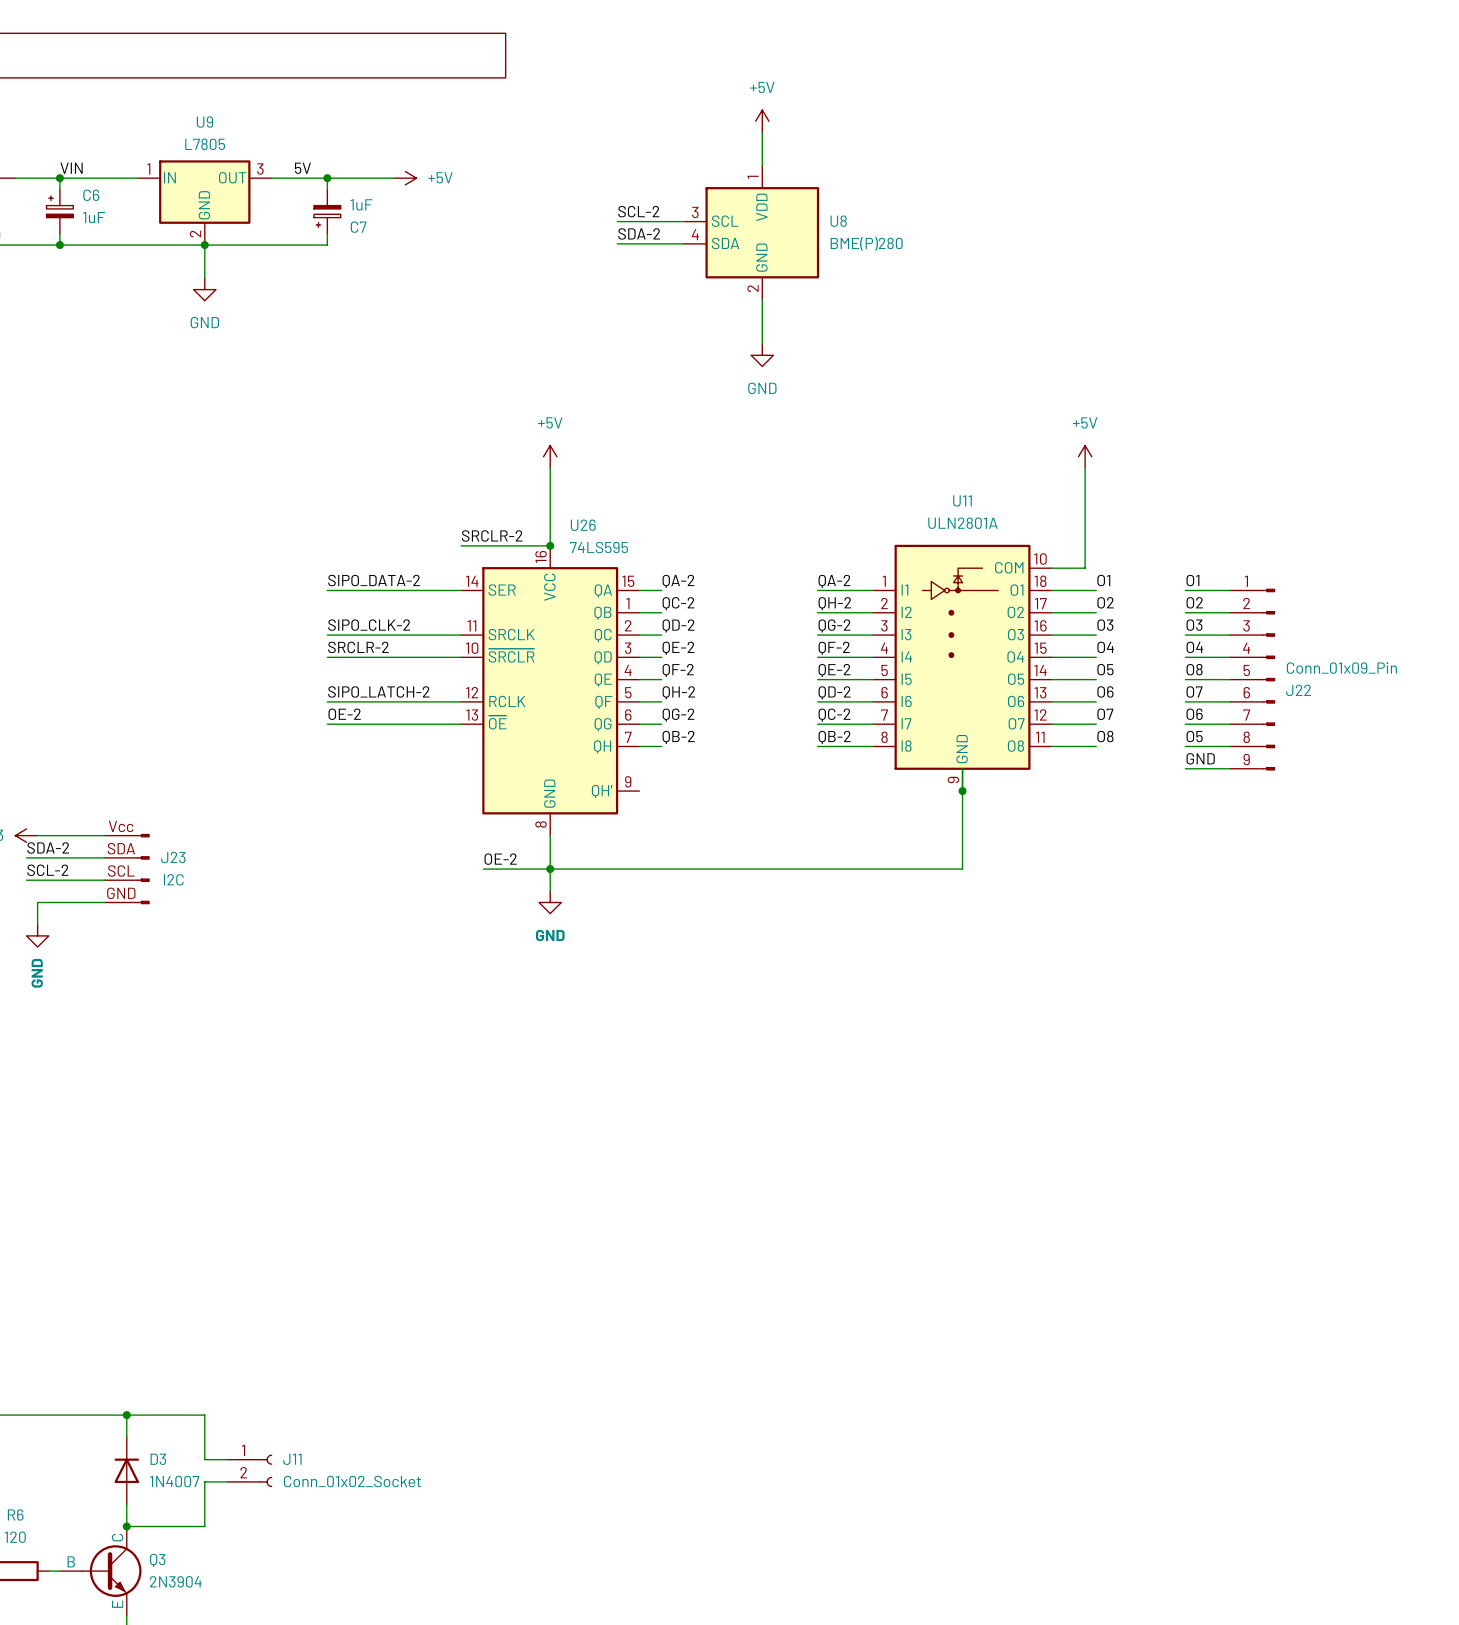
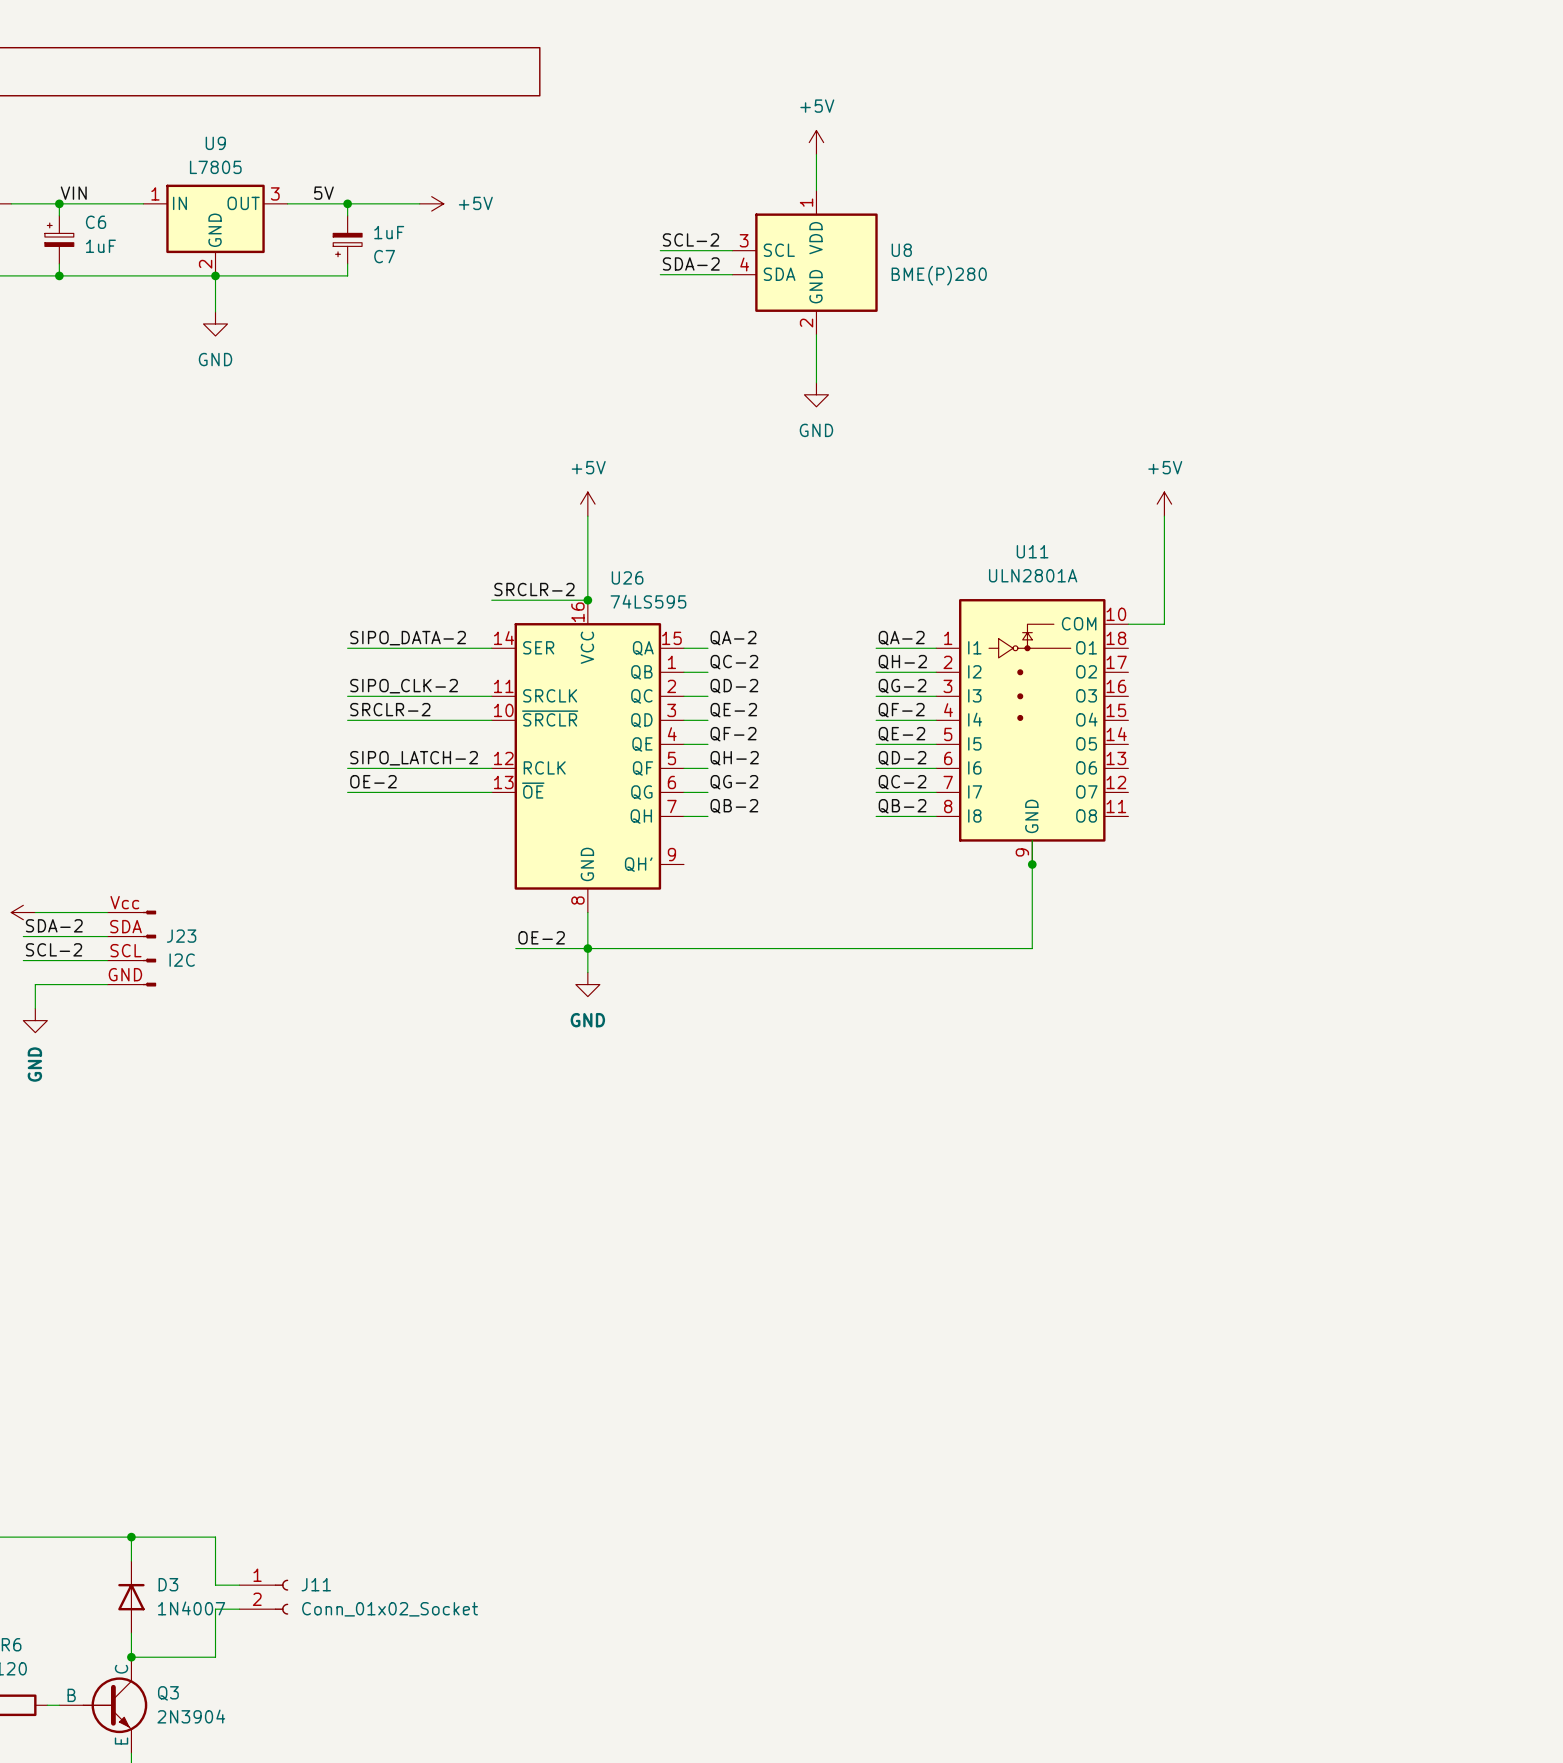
label: O1 (1103, 580) -> none
label: O1 (1192, 580) -> none
wire: (1051, 590) (1096, 590) -> none
wire: (1185, 590) (1229, 590) -> none
label: O2 (1105, 602) -> none
label: O2 (1194, 602) -> none
wire: (1051, 612) (1096, 612) -> none
wire: (1185, 612) (1229, 612) -> none
label: O3 (1105, 625) -> none
label: O3 (1194, 625) -> none
wire: (1051, 635) (1096, 635) -> none
wire: (1185, 635) (1229, 635) -> none
label: O4 (1105, 647) -> none
label: O4 (1194, 647) -> none
wire: (1051, 657) (1096, 657) -> none
wire: (1185, 657) (1229, 657) -> none
label: O5 (1105, 669) -> none
label: O8 (1194, 669) -> none
wire: (1051, 679) (1096, 679) -> none
wire: (1185, 679) (1229, 679) -> none
J22: Conn_01x09_Pin (1252, 679) -> none
label: O6 (1105, 691) -> none
label: O7 (1194, 691) -> none
wire: (1051, 701) (1096, 701) -> none
wire: (1185, 701) (1229, 701) -> none
label: O7 (1105, 714) -> none
label: O6 (1194, 714) -> none
wire: (1051, 724) (1096, 724) -> none
wire: (1185, 724) (1229, 724) -> none
label: O8 (1105, 736) -> none
label: O5 (1194, 736) -> none
wire: (1051, 746) (1096, 746) -> none
wire: (1185, 746) (1229, 746) -> none
label: GND (1200, 758) -> none
wire: (1185, 768) (1229, 768) -> none

